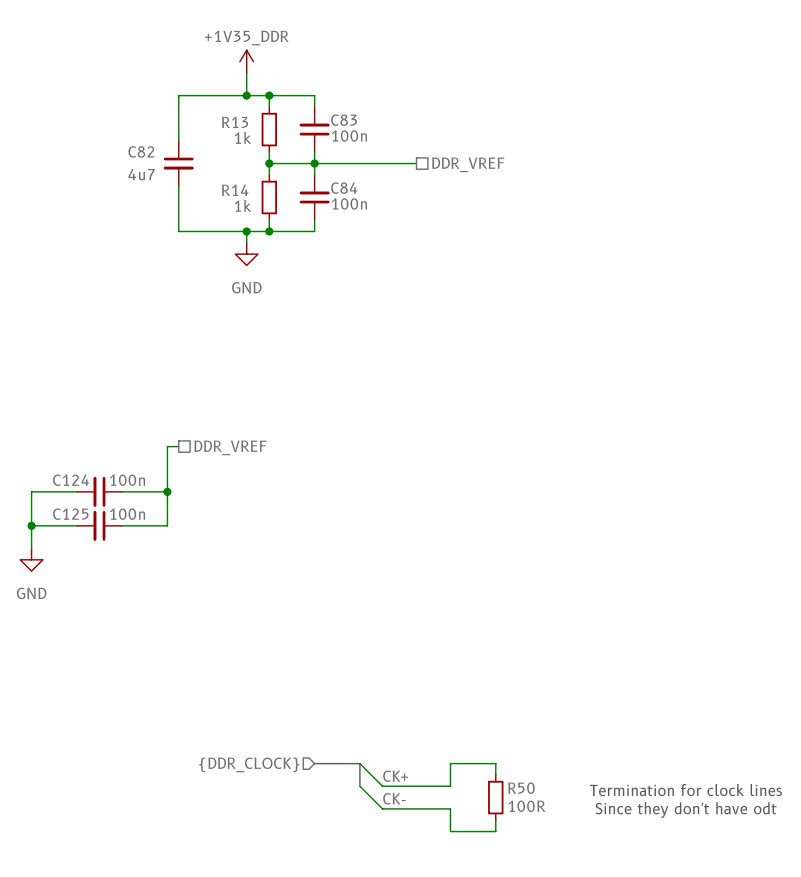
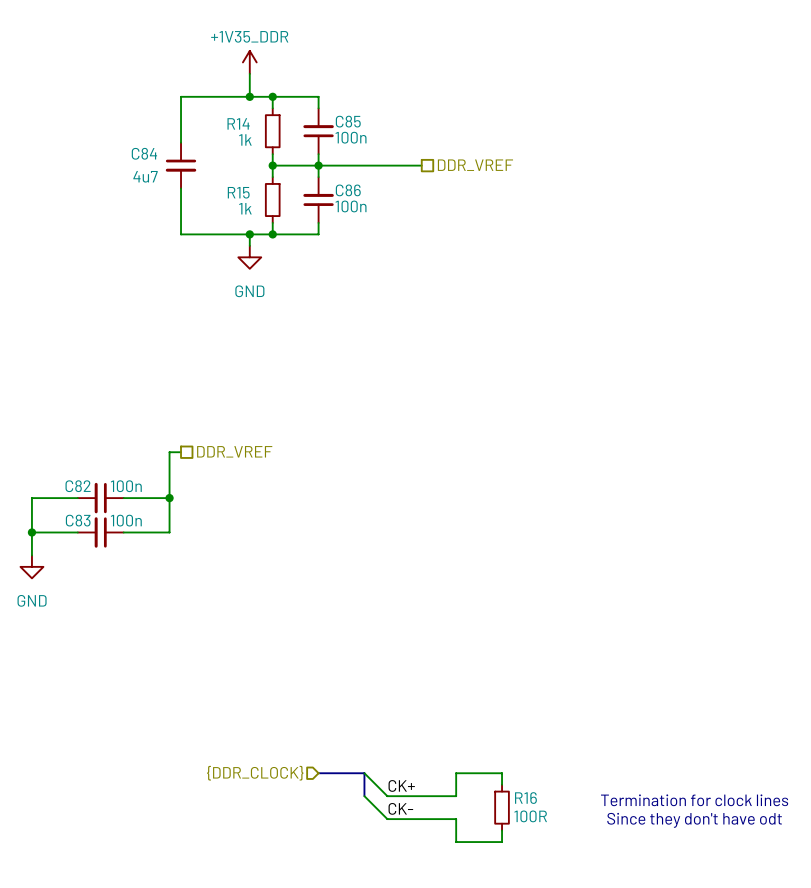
C83 name: C83 (344, 120) -> C85 (348, 121)
R13 name: R13 (235, 122) -> R14 (238, 123)
C82 name: C82 (141, 151) -> C84 (144, 153)
C84 name: C84 (344, 188) -> C86 (348, 190)
R14 name: R14 (235, 190) -> R15 (238, 192)
C124 name: C124 (71, 480) -> C82 (78, 486)
C125 name: C125 (70, 514) -> C83 (78, 520)
R50 name: R50 (521, 788) -> R16 (525, 798)

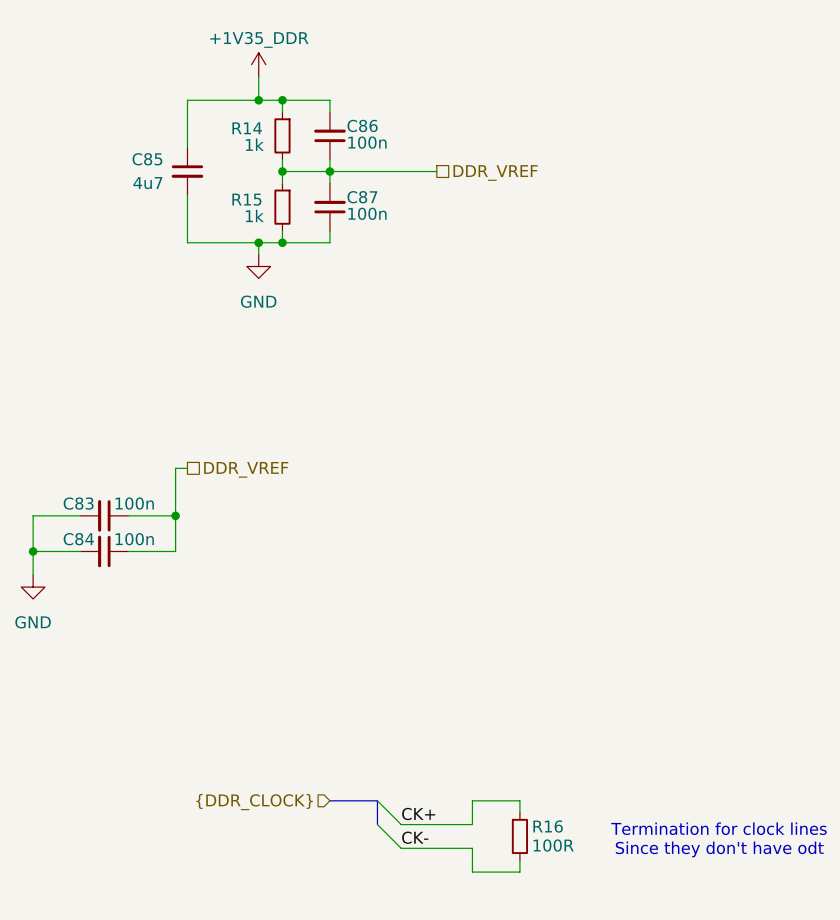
C85 name: C85 (348, 121) -> C86 (362, 125)
C84 name: C84 (144, 153) -> C85 (147, 159)
C86 name: C86 (348, 190) -> C87 (362, 197)
C82 name: C82 (78, 486) -> C83 (78, 503)
C83 name: C83 (78, 520) -> C84 (78, 539)

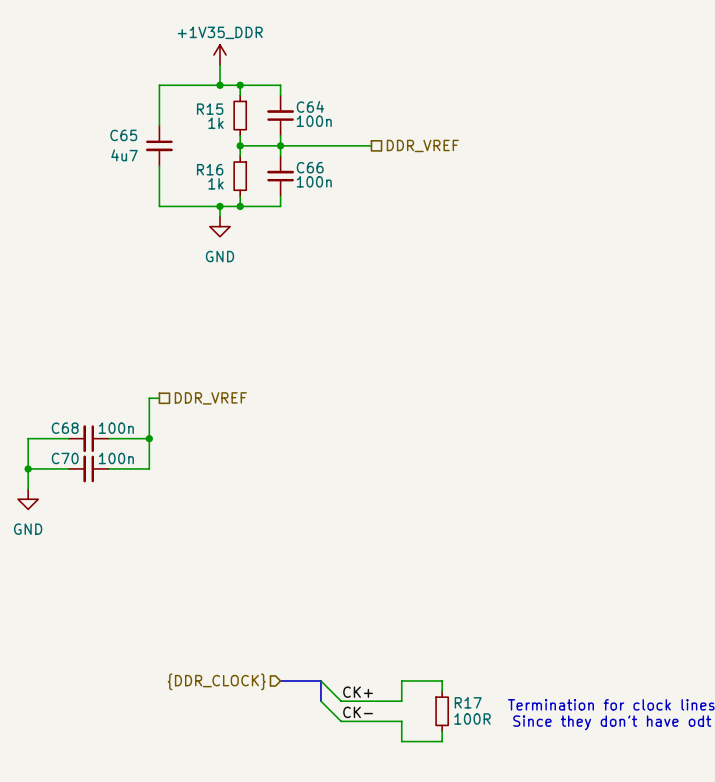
C86 name: C86 (362, 125) -> C64 (310, 106)
R14 name: R14 (247, 128) -> R15 (210, 109)
C85 name: C85 (147, 159) -> C65 (123, 135)
C87 name: C87 (362, 197) -> C66 (310, 167)
R15 name: R15 (246, 199) -> R16 (210, 169)
C83 name: C83 (78, 503) -> C68 (65, 428)
C84 name: C84 (78, 539) -> C70 (65, 458)
R16 name: R16 (548, 826) -> R17 (468, 702)

